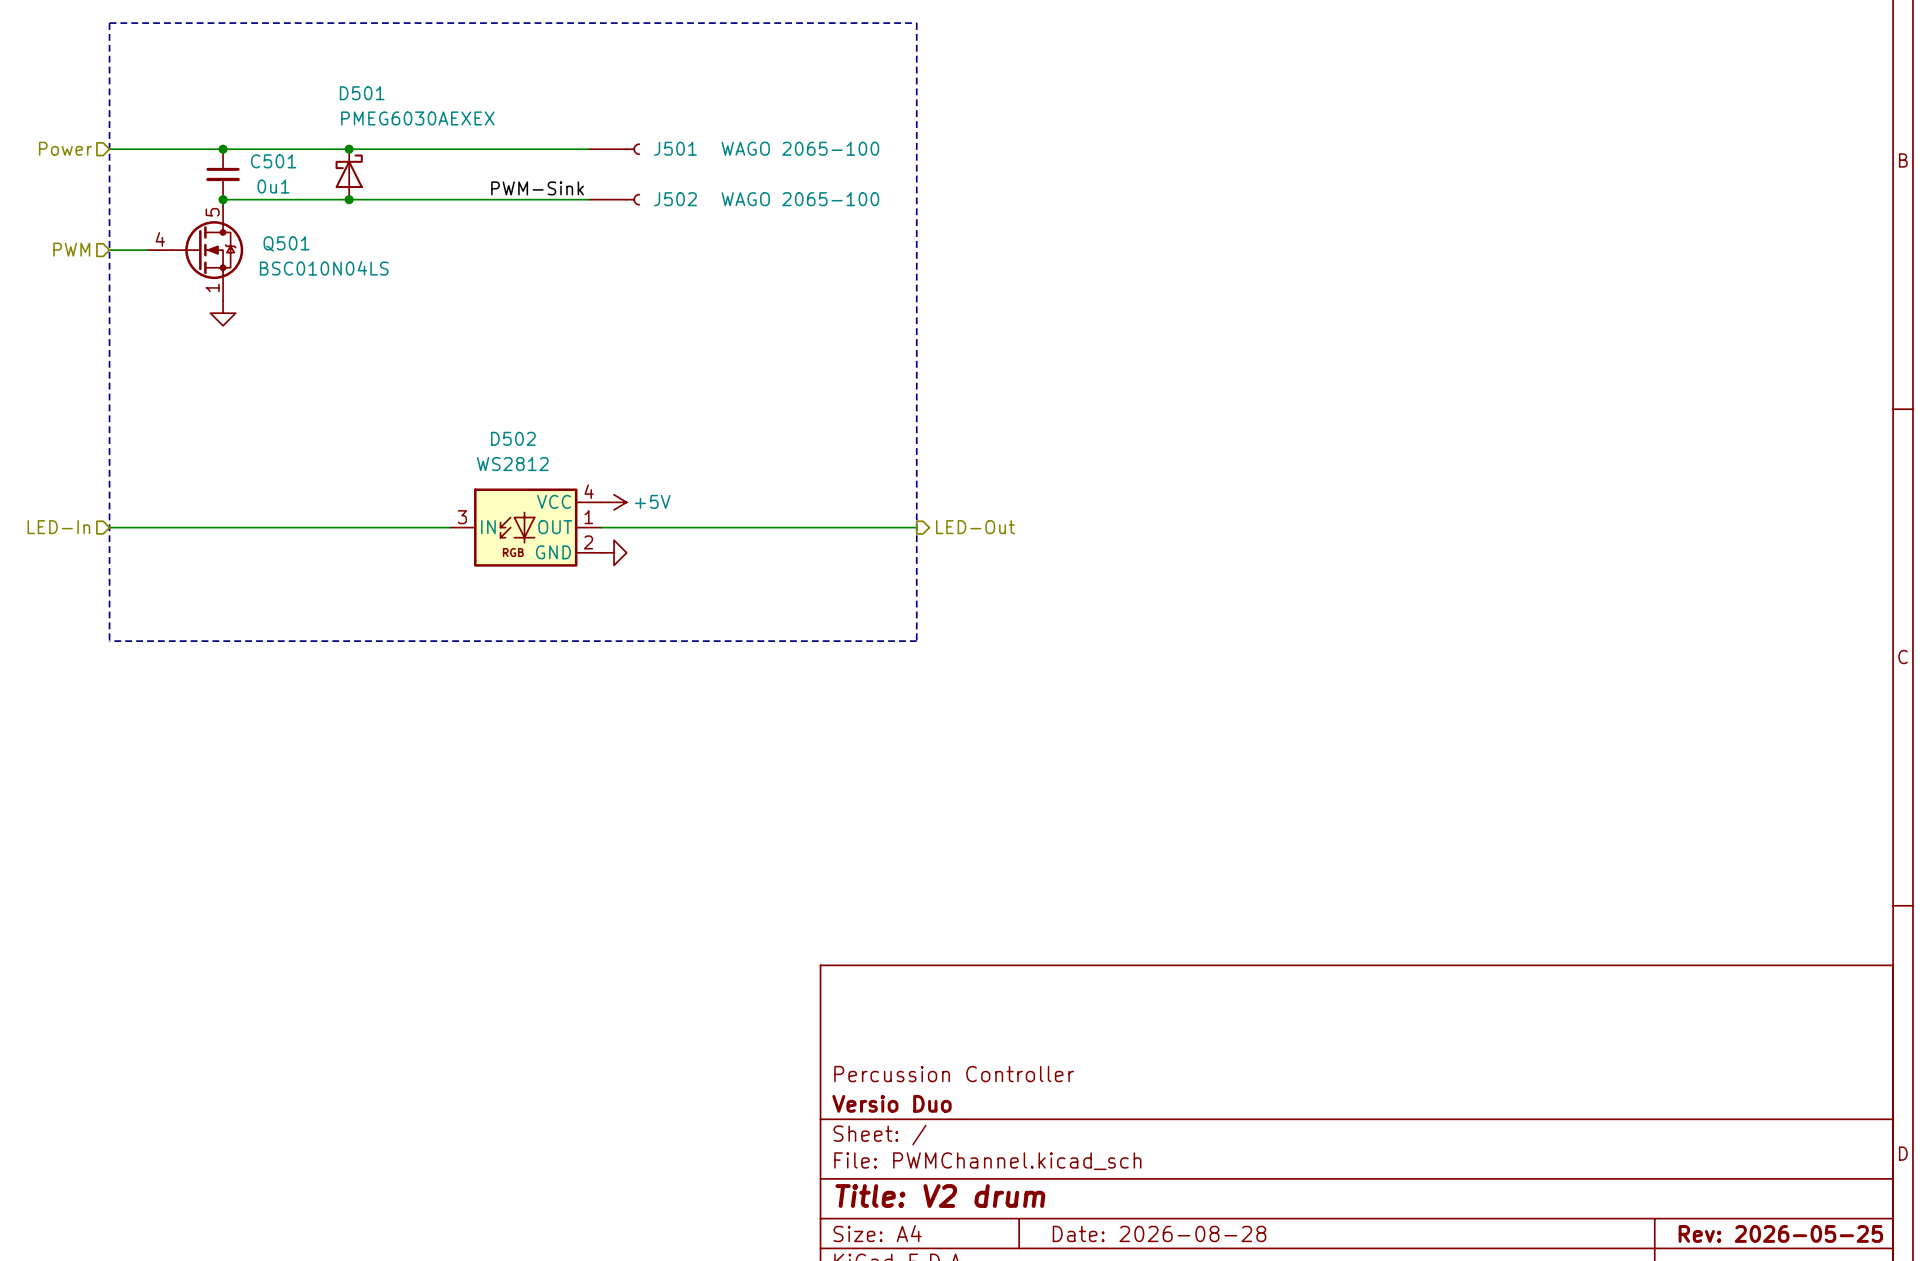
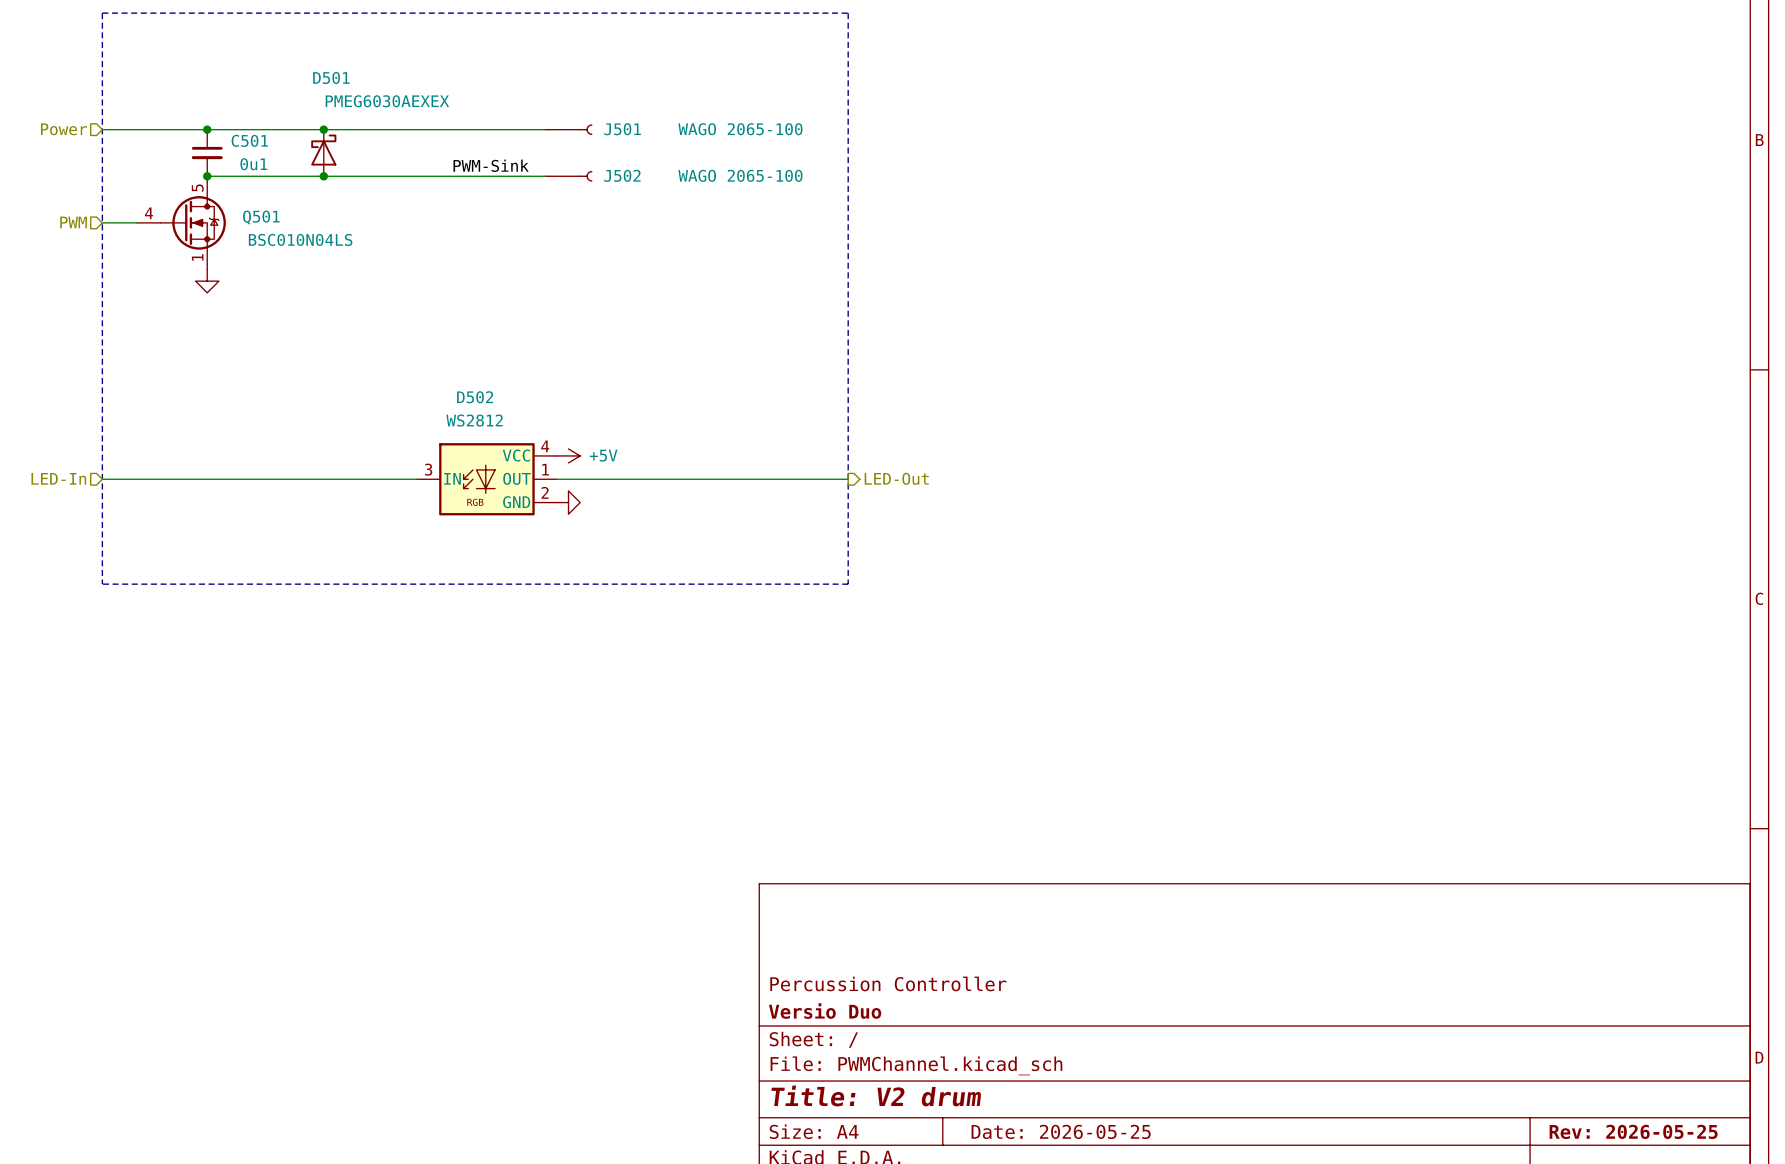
title block: Date: 2026-08-28 (1159, 1233) -> Date: 2026-05-25 (1061, 1131)

